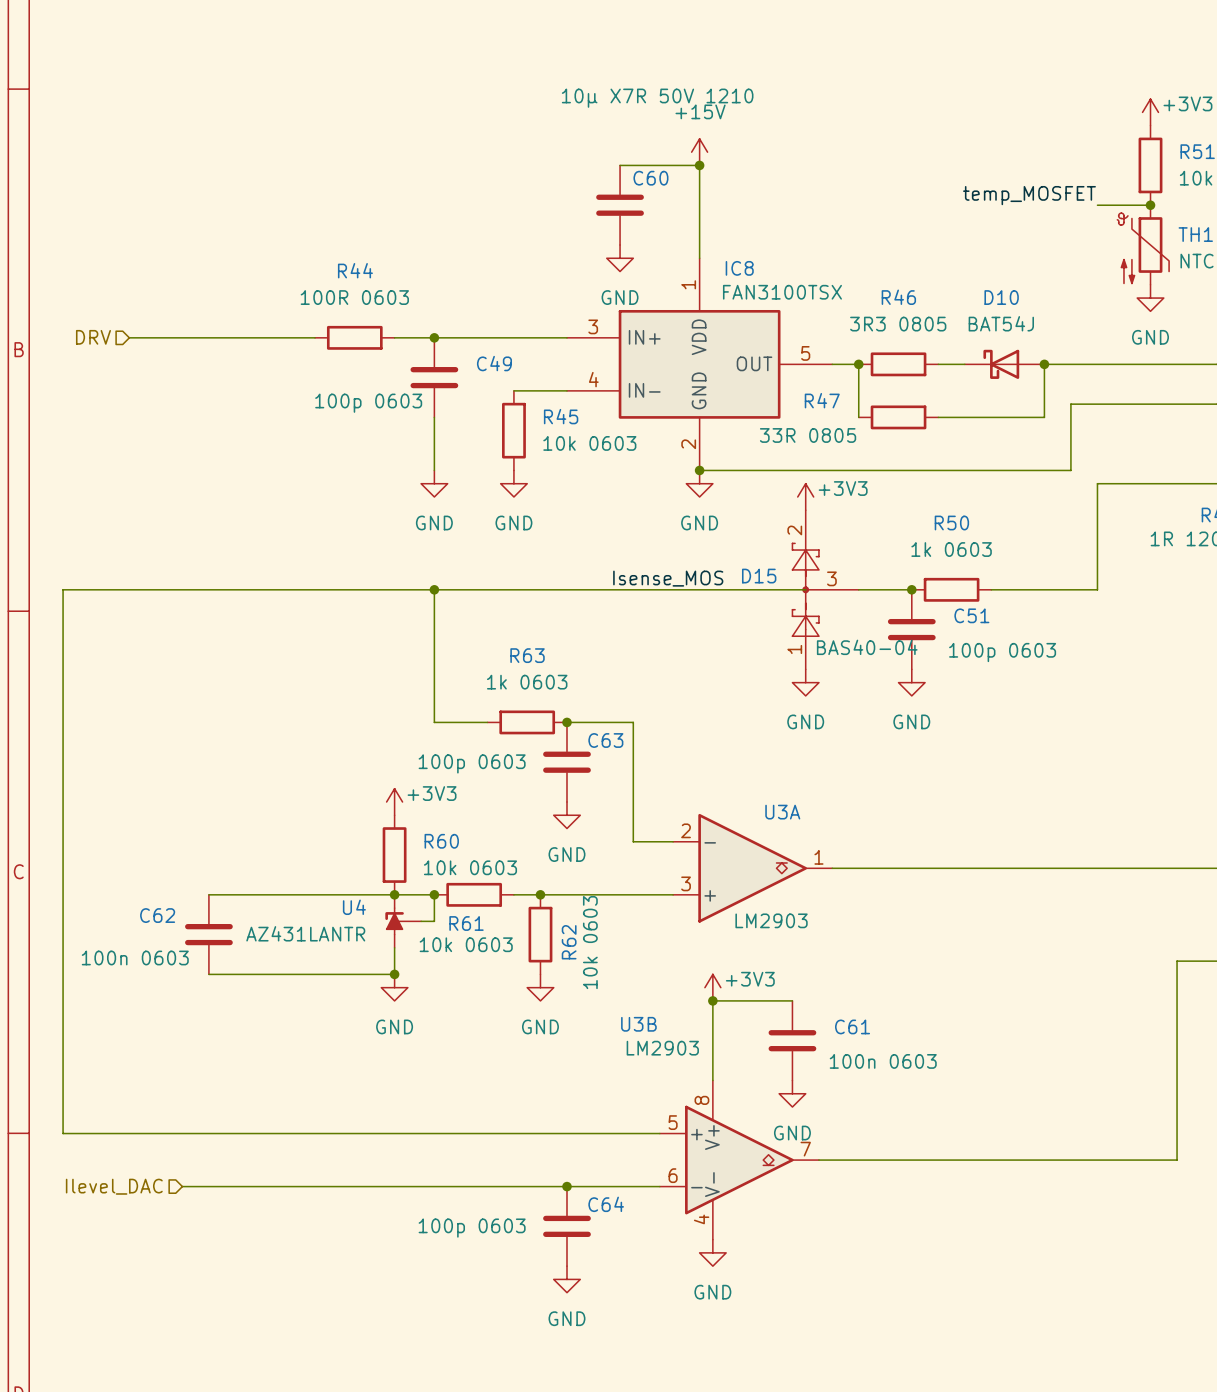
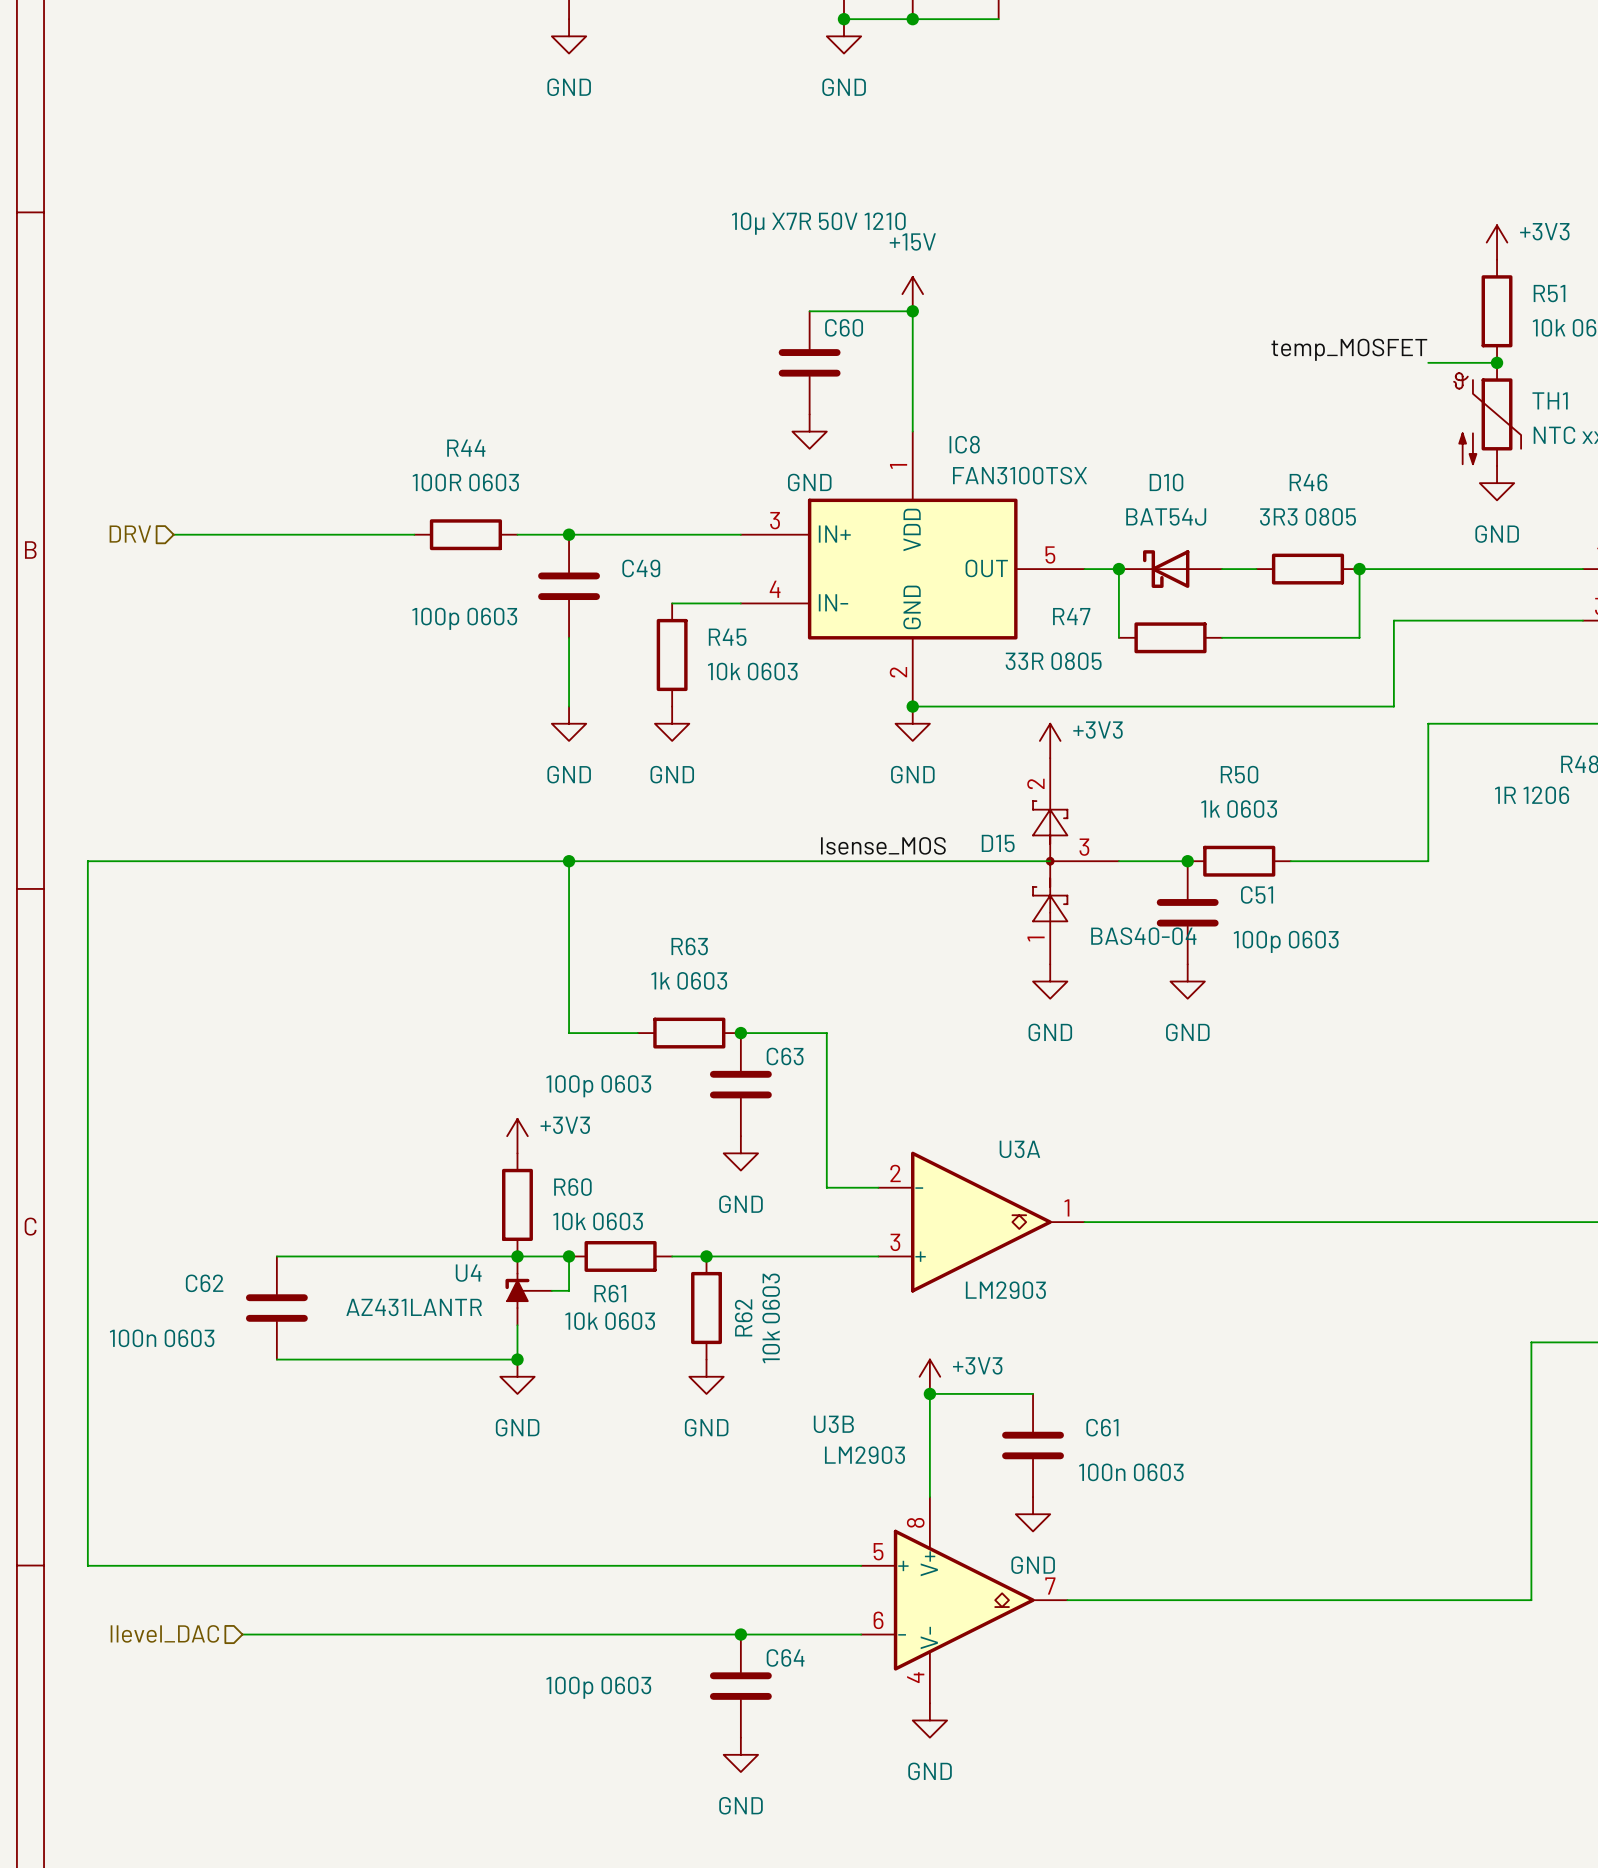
R46 position: (898, 364) -> (1307, 569)
D10 position: (1004, 364) -> (1170, 569)

